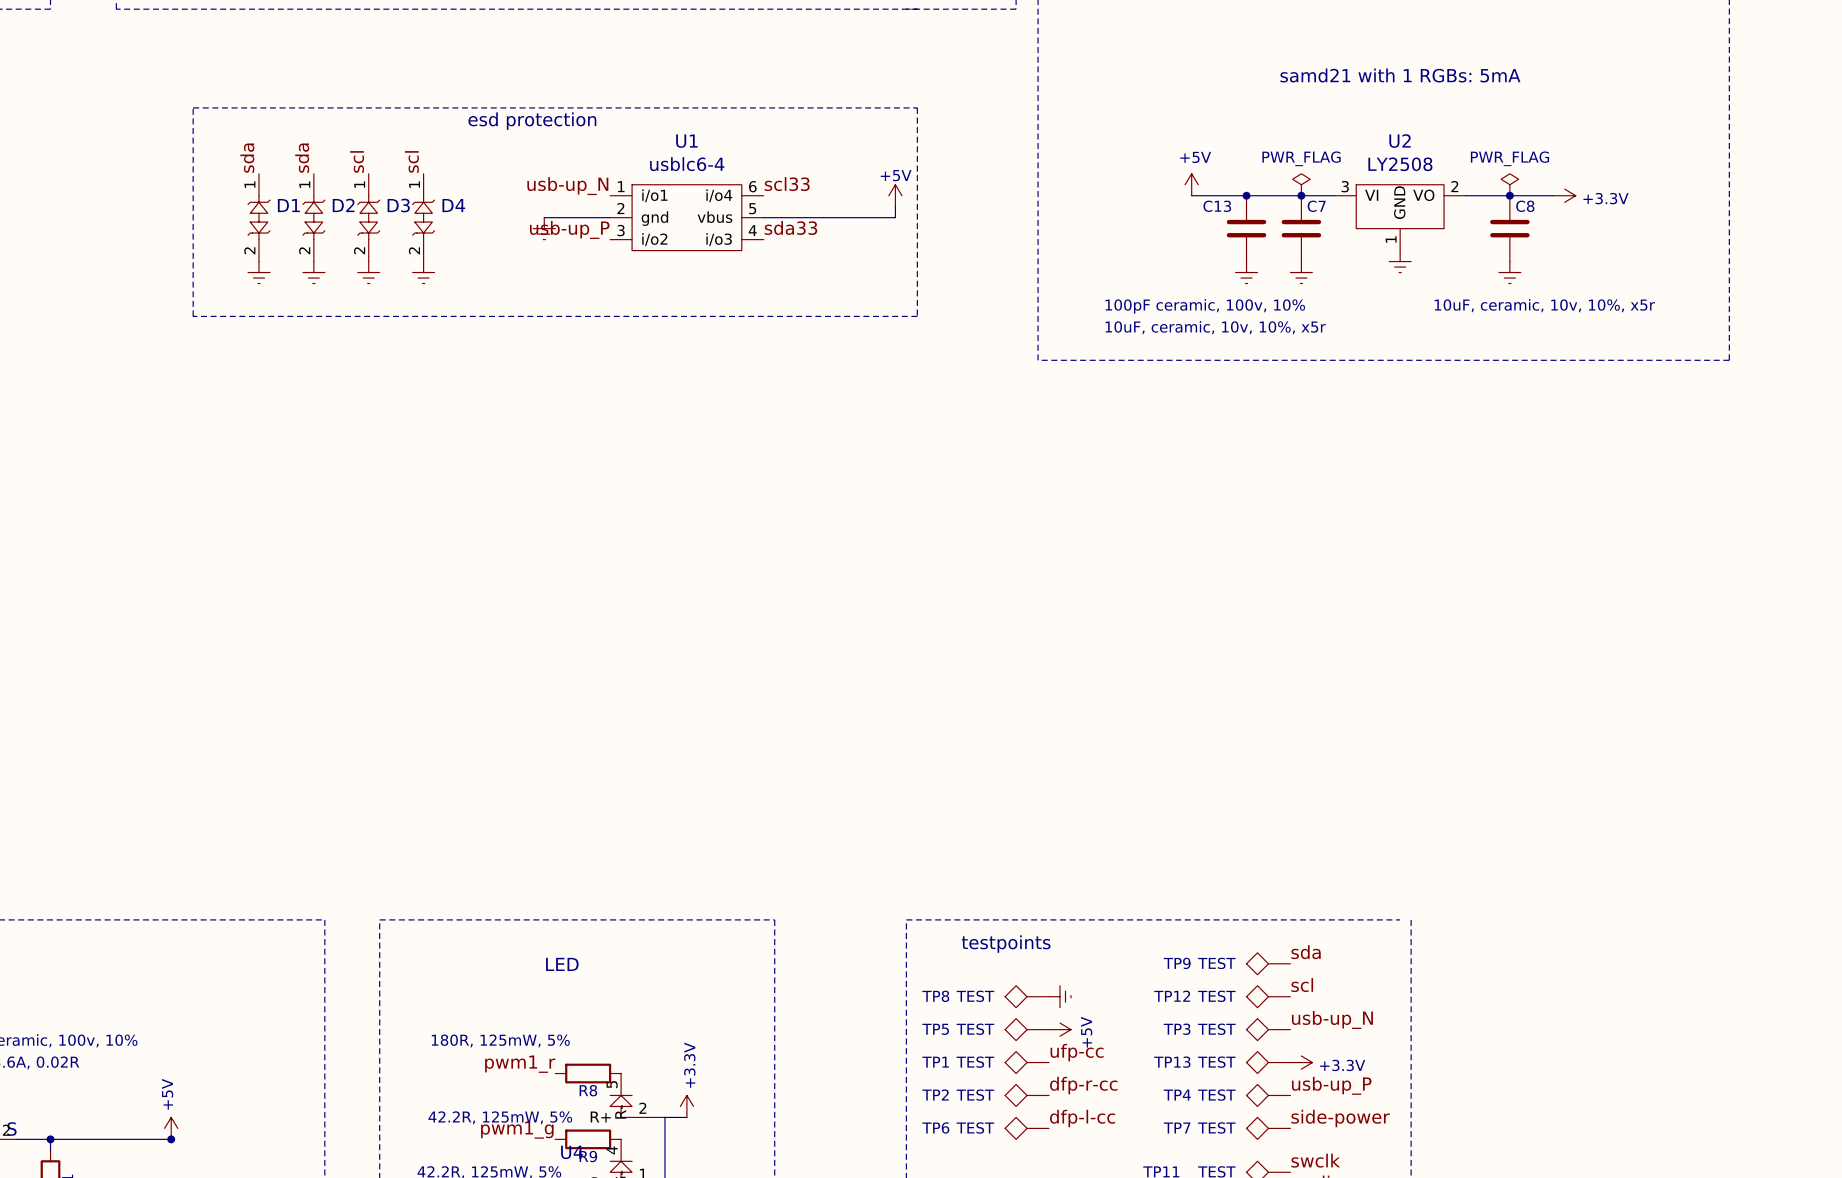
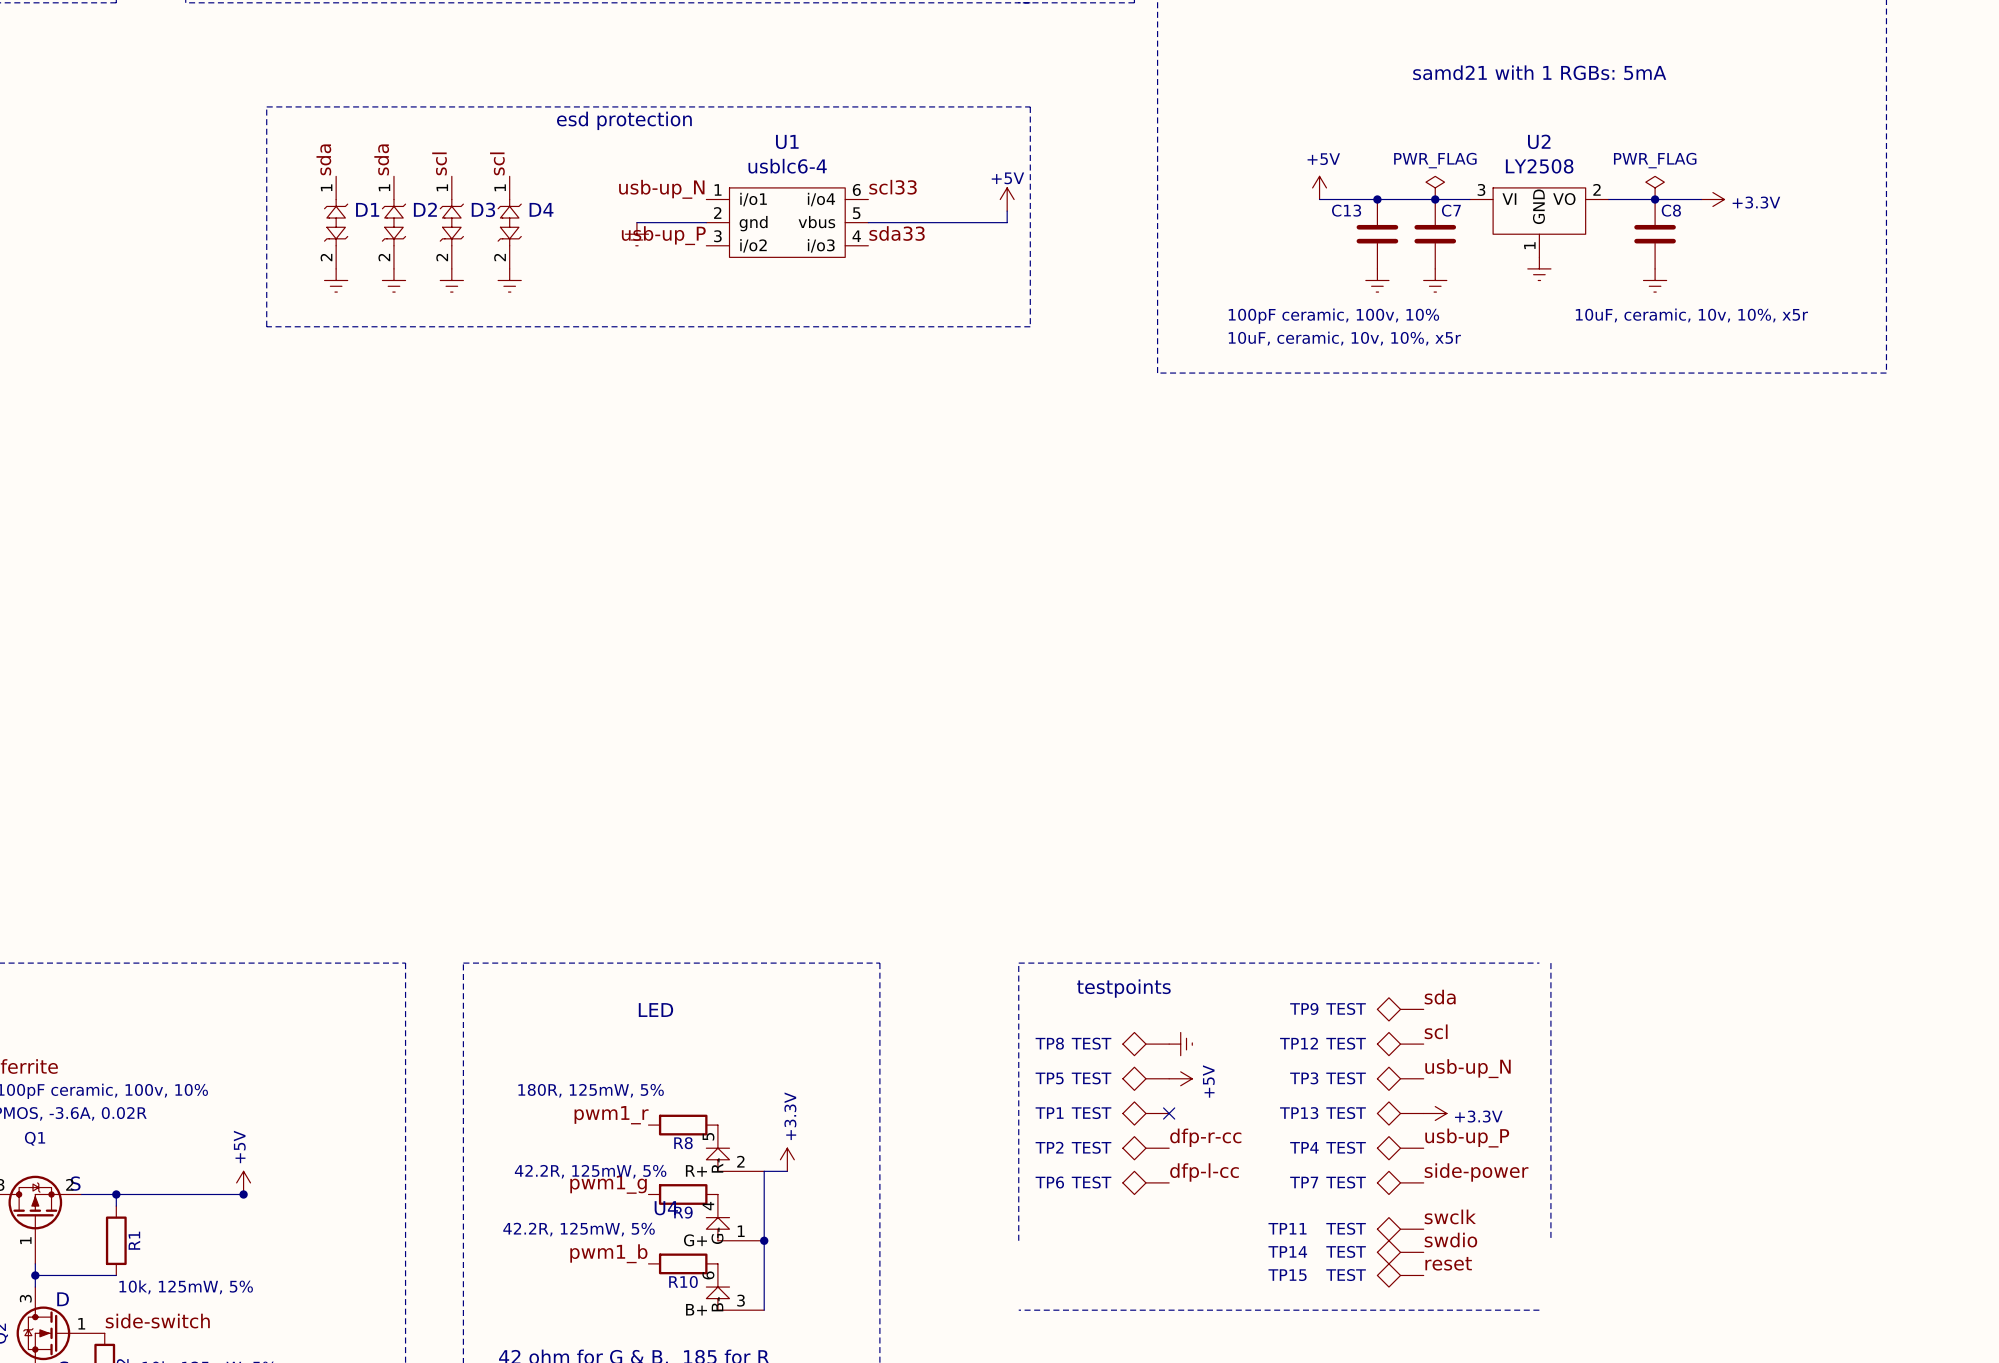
label: ufp-cc (1077, 1052) -> none
no-connect mark: none -> (1169, 1113)

